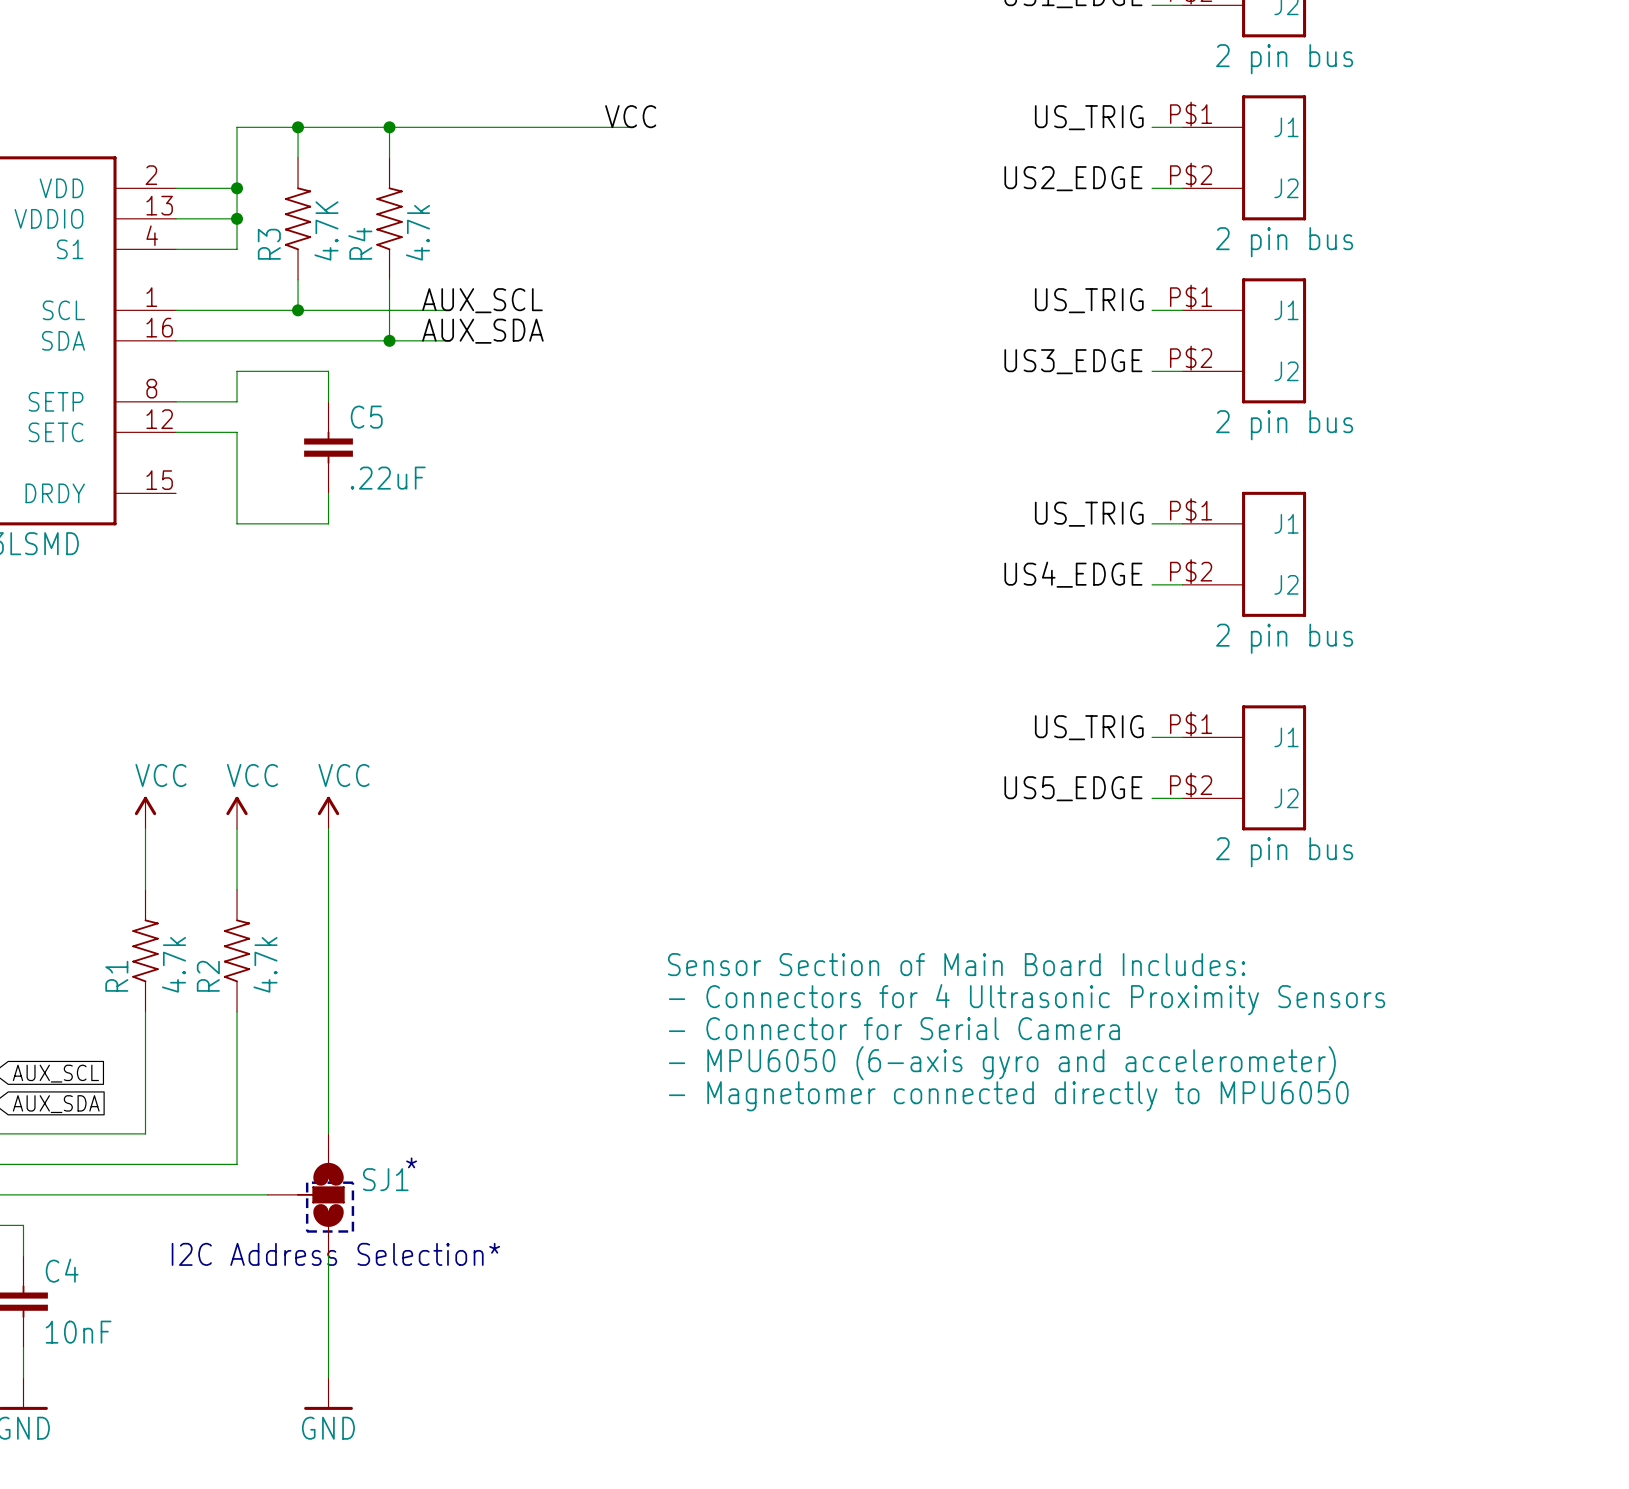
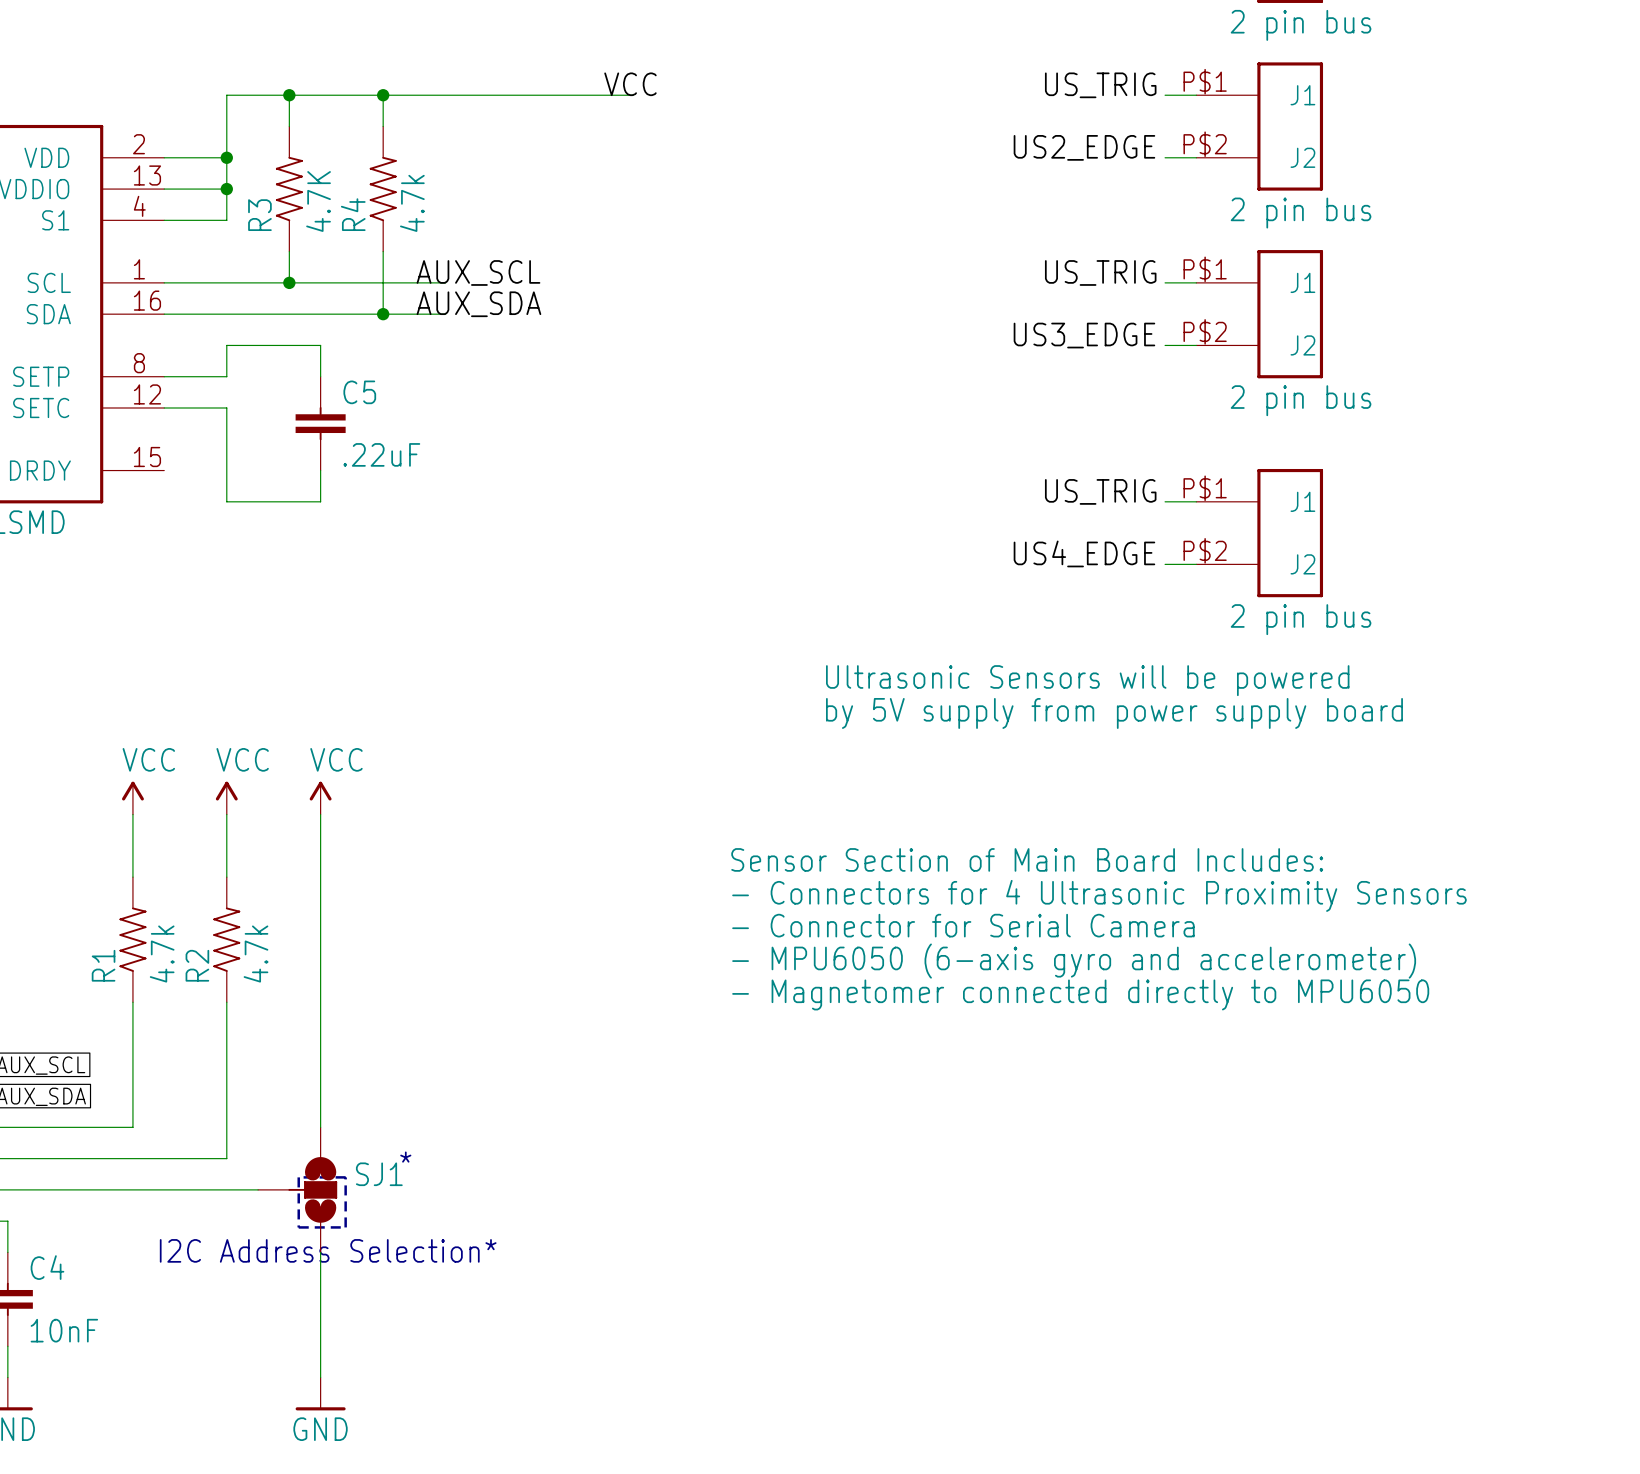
text: none -> Ultrasonic Sensors will be powered (1087, 680)
label: US_TRIG (1089, 727) -> none
text: none -> by 5V supply from power supply board (1114, 713)
wire: (1152, 737) (1182, 737) -> none
part: (1244, 767) -> none
label: US5_EDGE (1073, 788) -> none
wire: (1152, 798) (1182, 798) -> none
text position: Sensor Section of Main Board Includes: (956, 964) -> Sensor Section of Main Board Includes: (1027, 859)
text position: - Connectors for 4 Ultrasonic Proximity Sensors (1027, 999) -> - Connectors for 4 Ultrasonic Proximity Sensors (1099, 895)
text position: - Connector for Serial Camera (894, 1028) -> - Connector for Serial Camera (963, 925)
text position: - MPU6050 (6-axis gyro and accelerometer) (1002, 1063) -> - MPU6050 (6-axis gyro and accelerometer) (1074, 961)
text position: - Magnetomer connected directly to MPU6050 (1008, 1096) -> - Magnetomer connected directly to MPU6050 (1080, 994)

